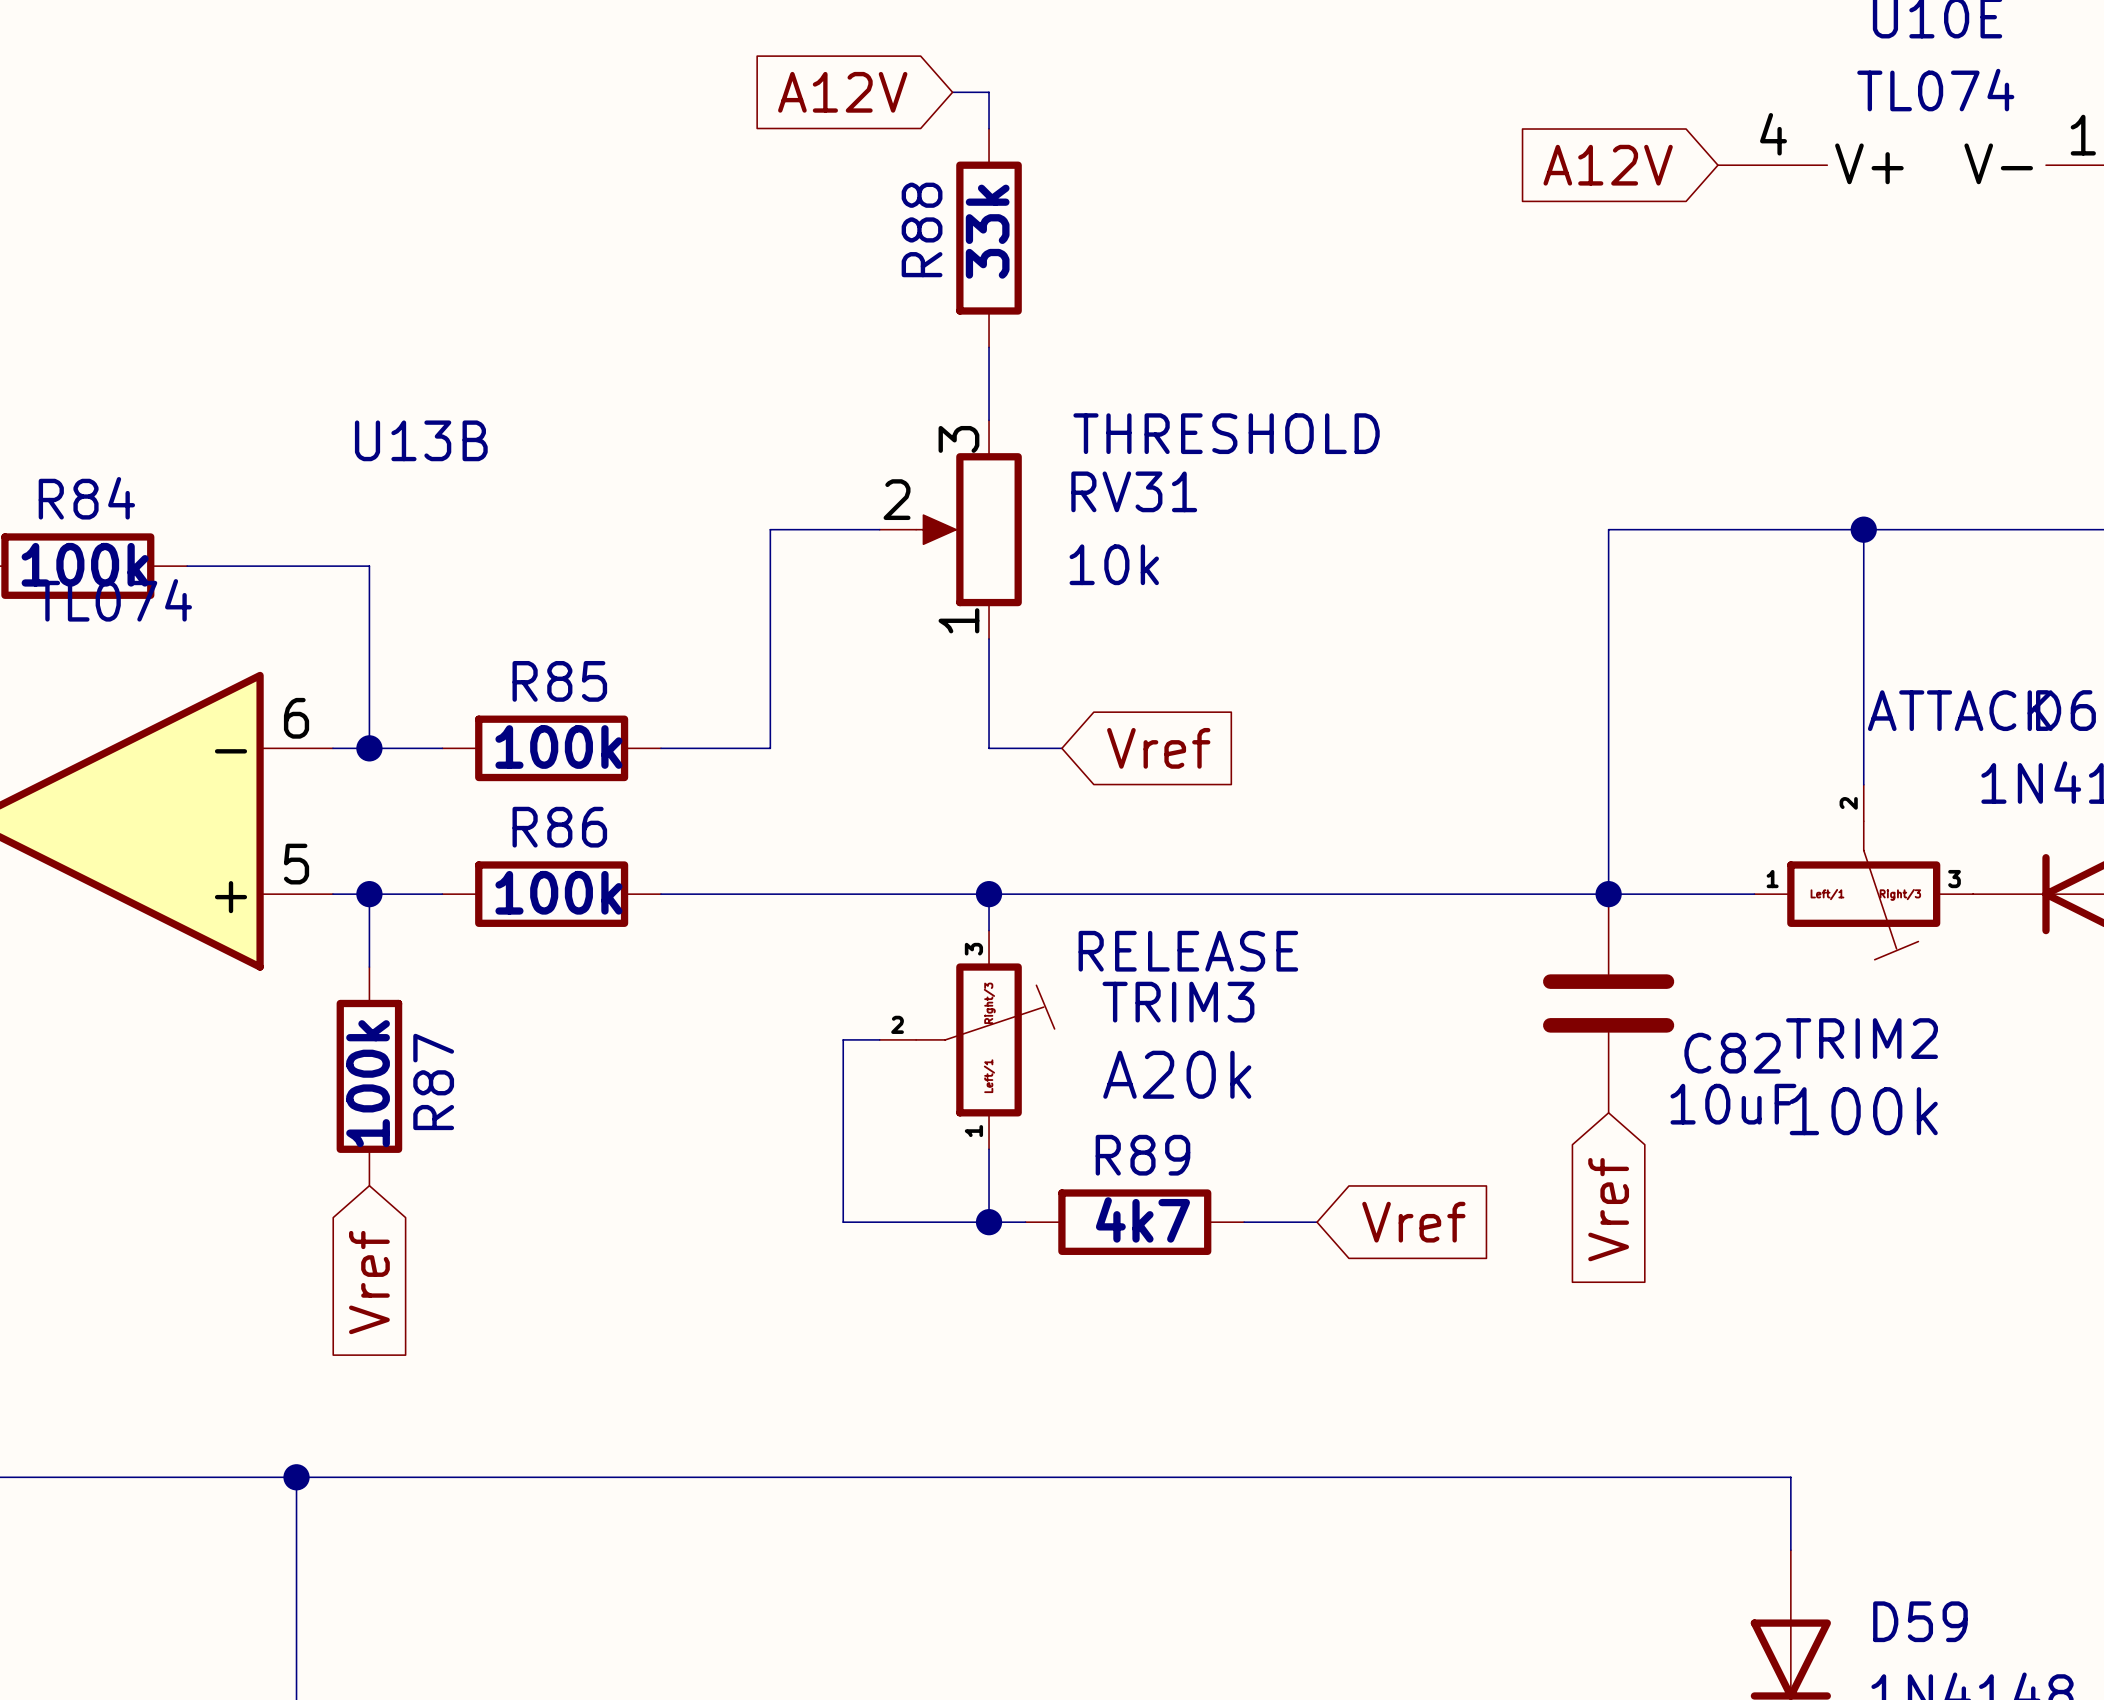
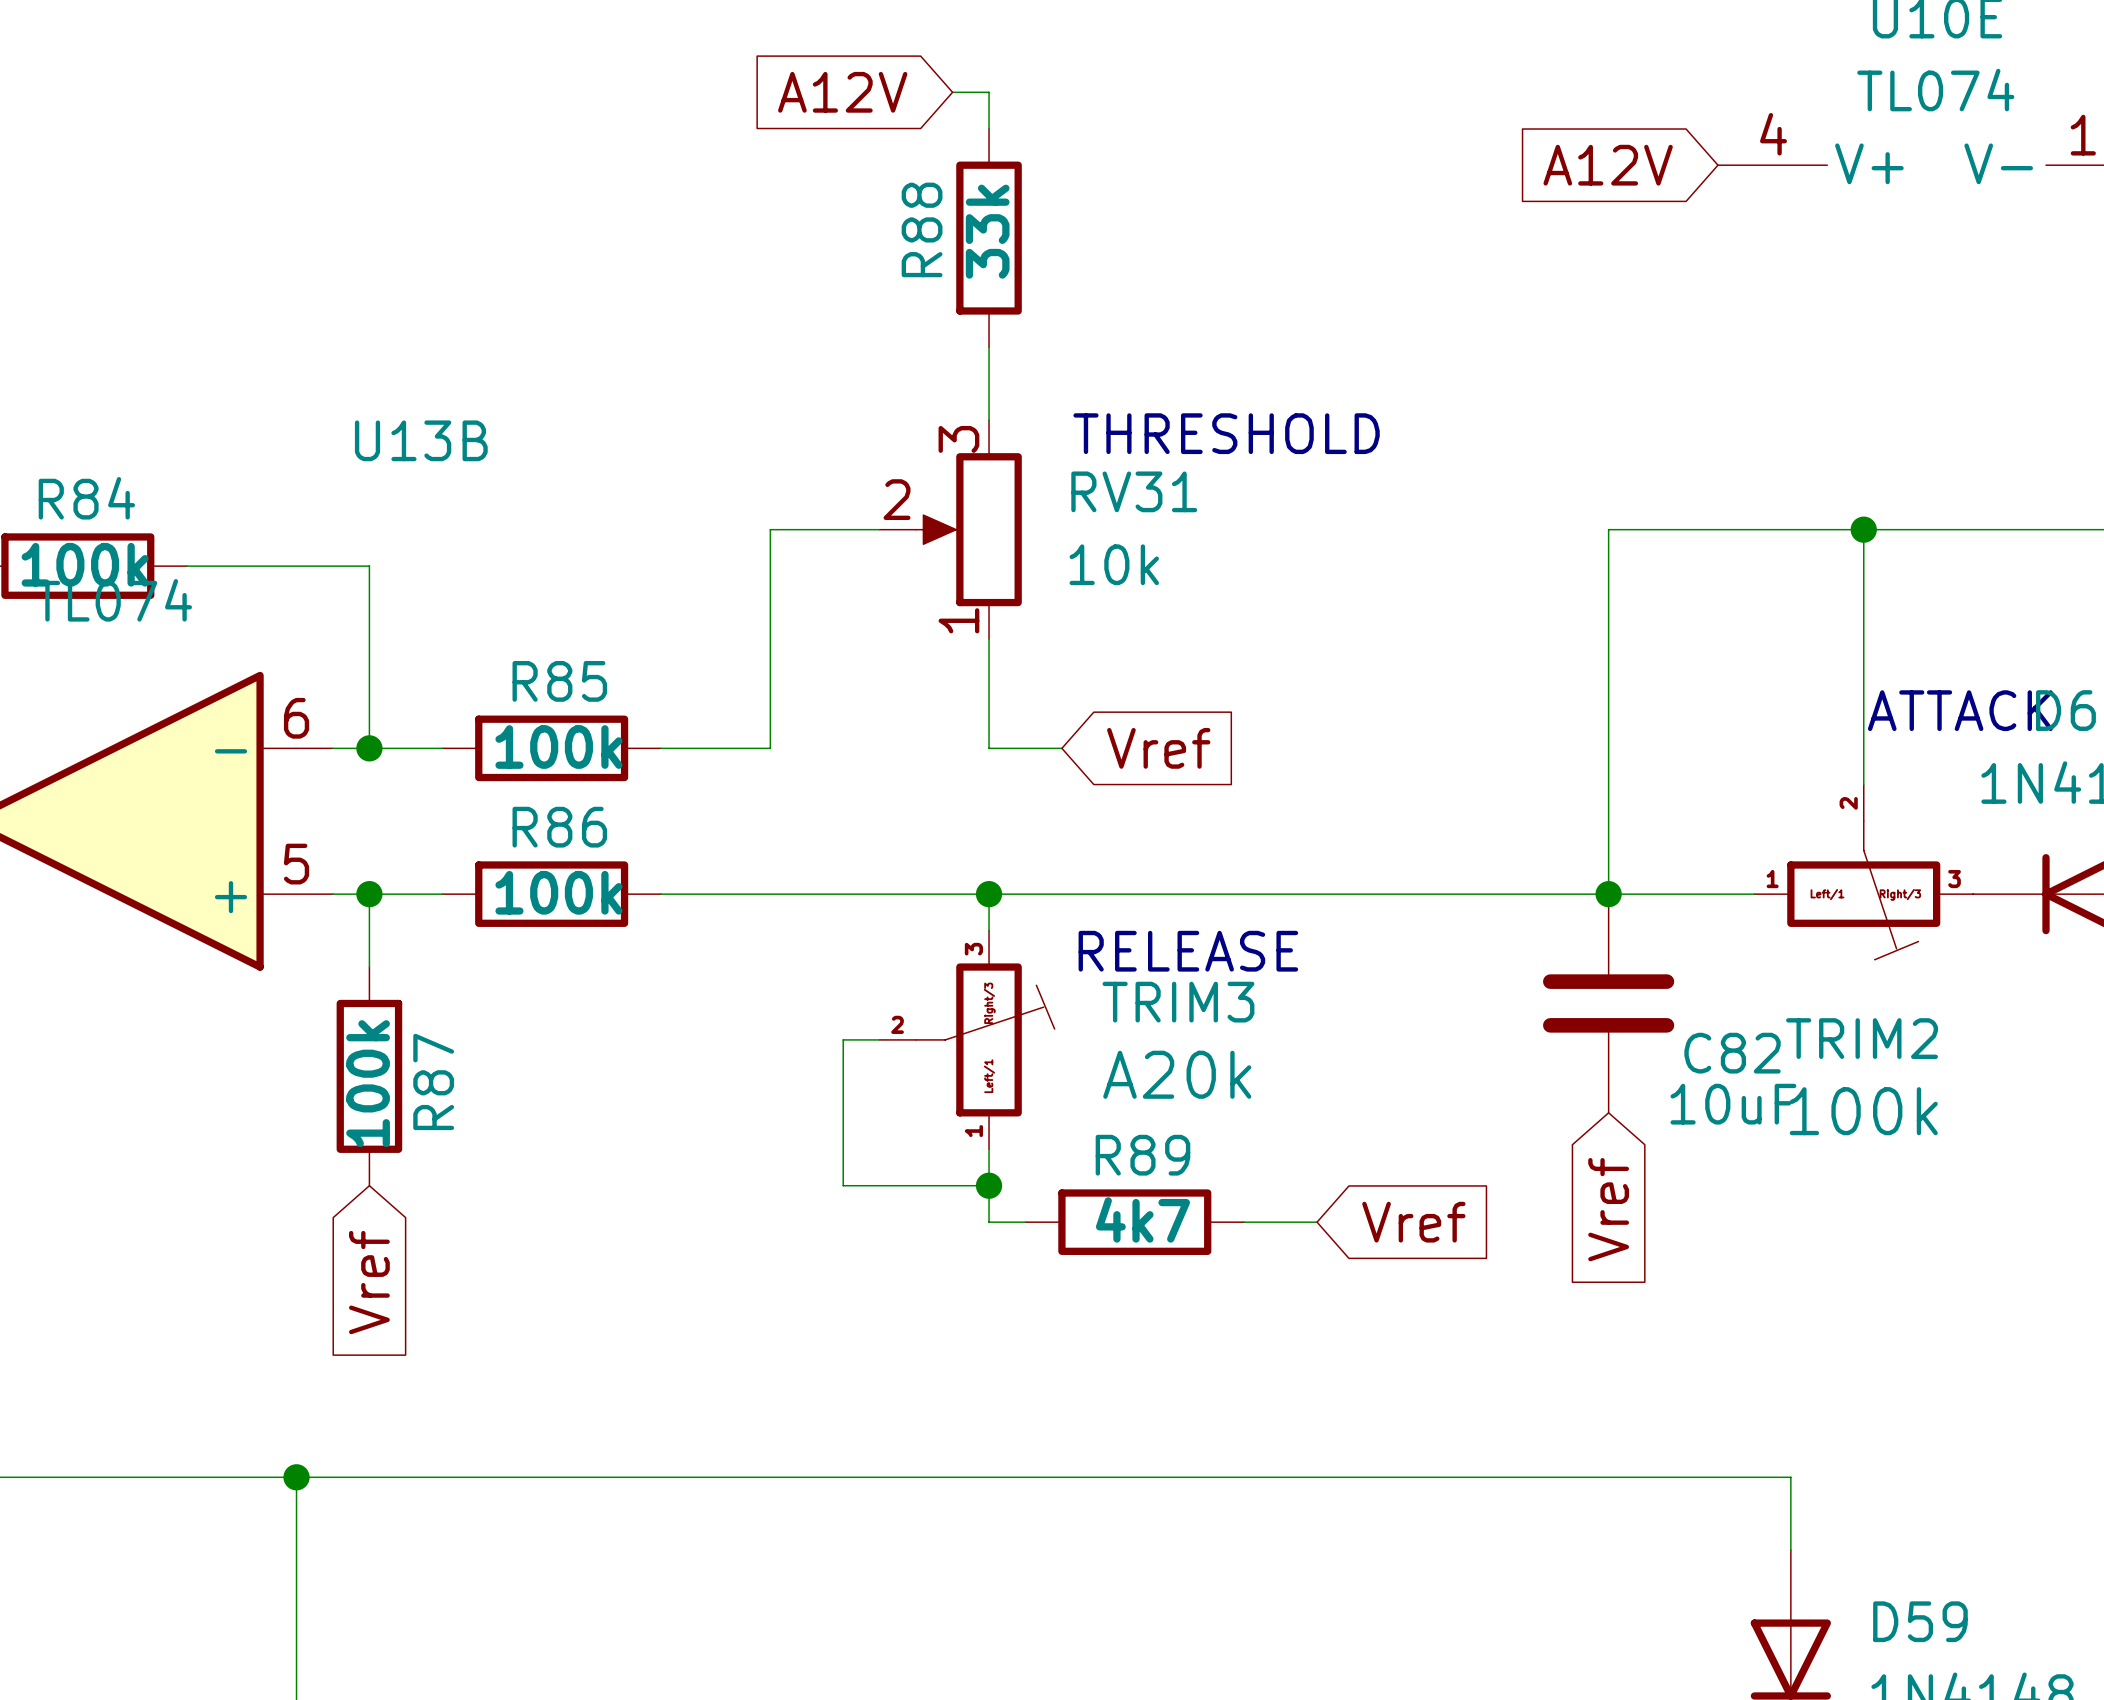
wire: (843, 1185) (843, 1222) (989, 1222) -> (843, 1185) (989, 1185)
junction position: (989, 1222) -> (989, 1185)

